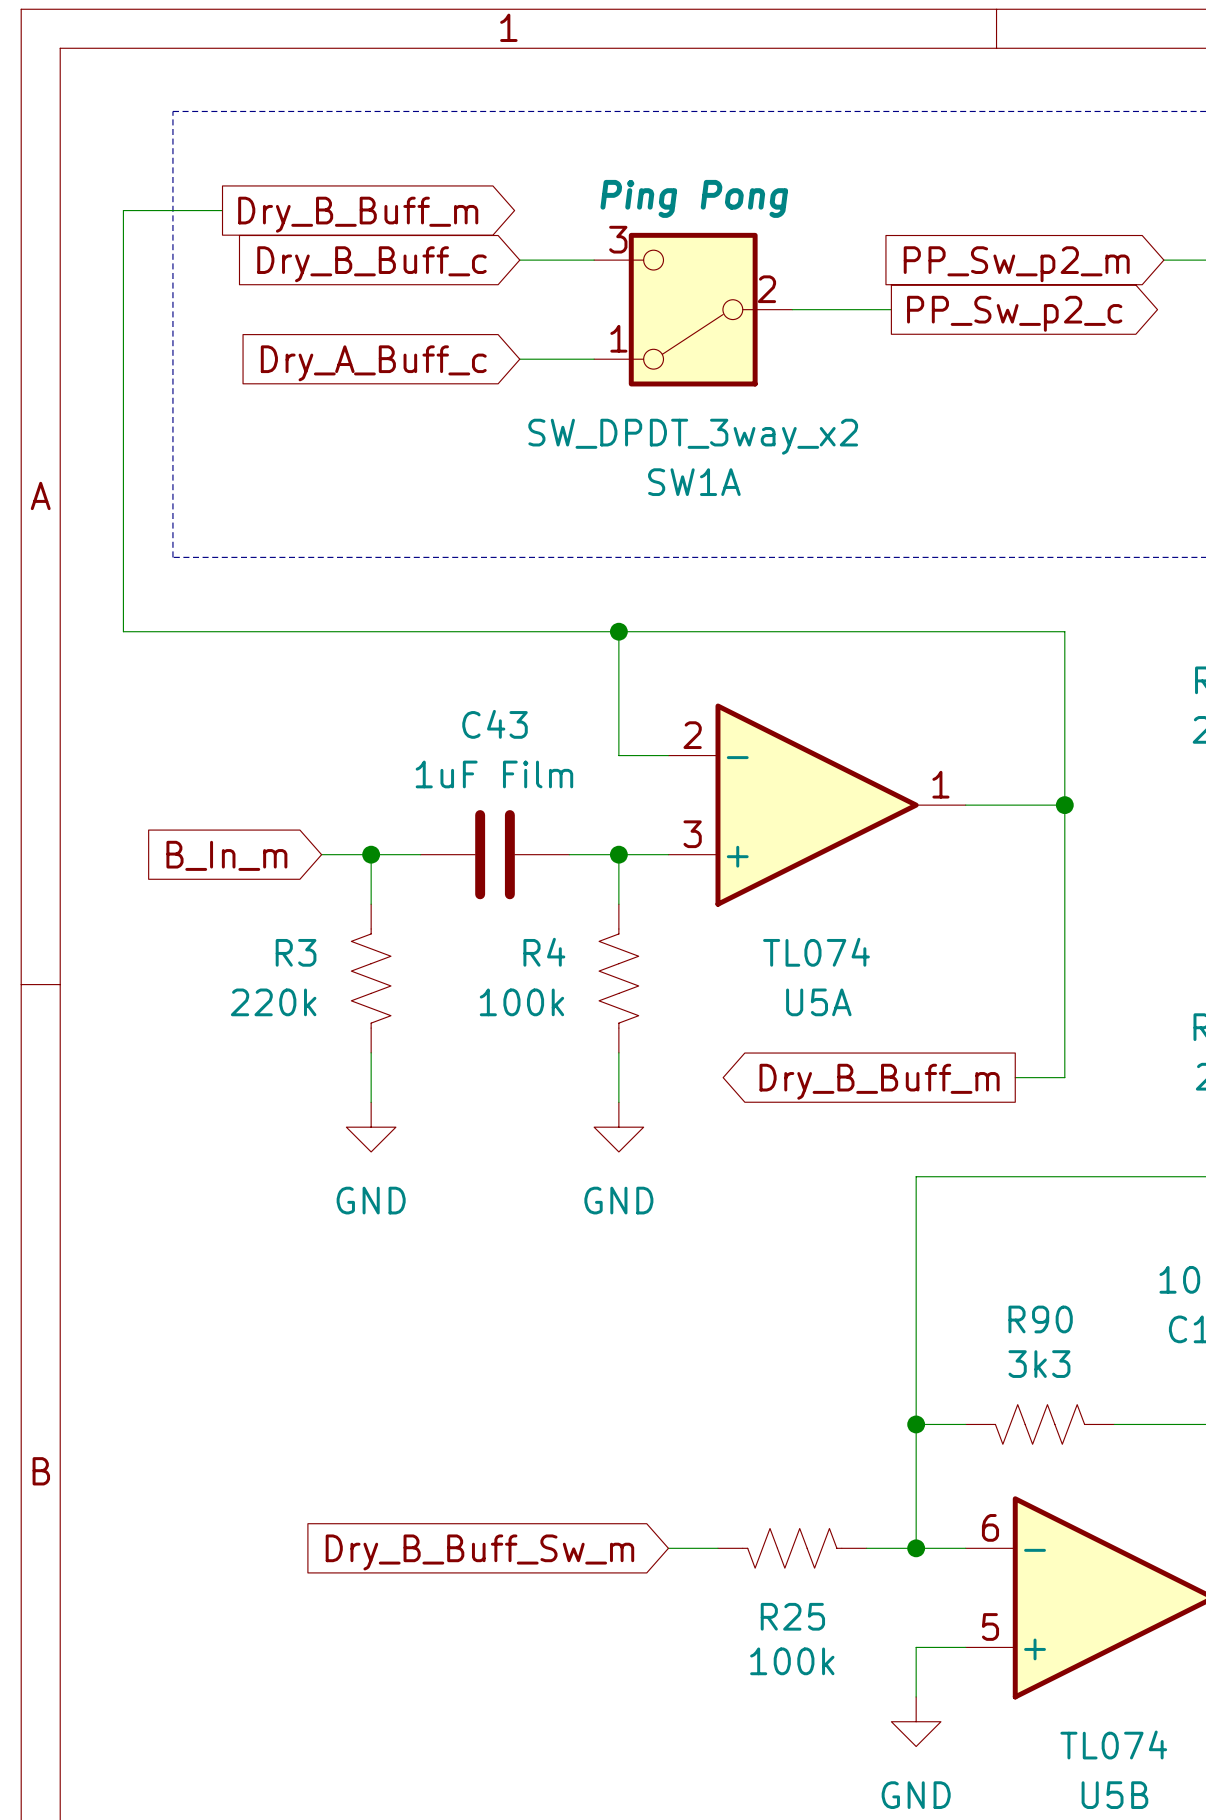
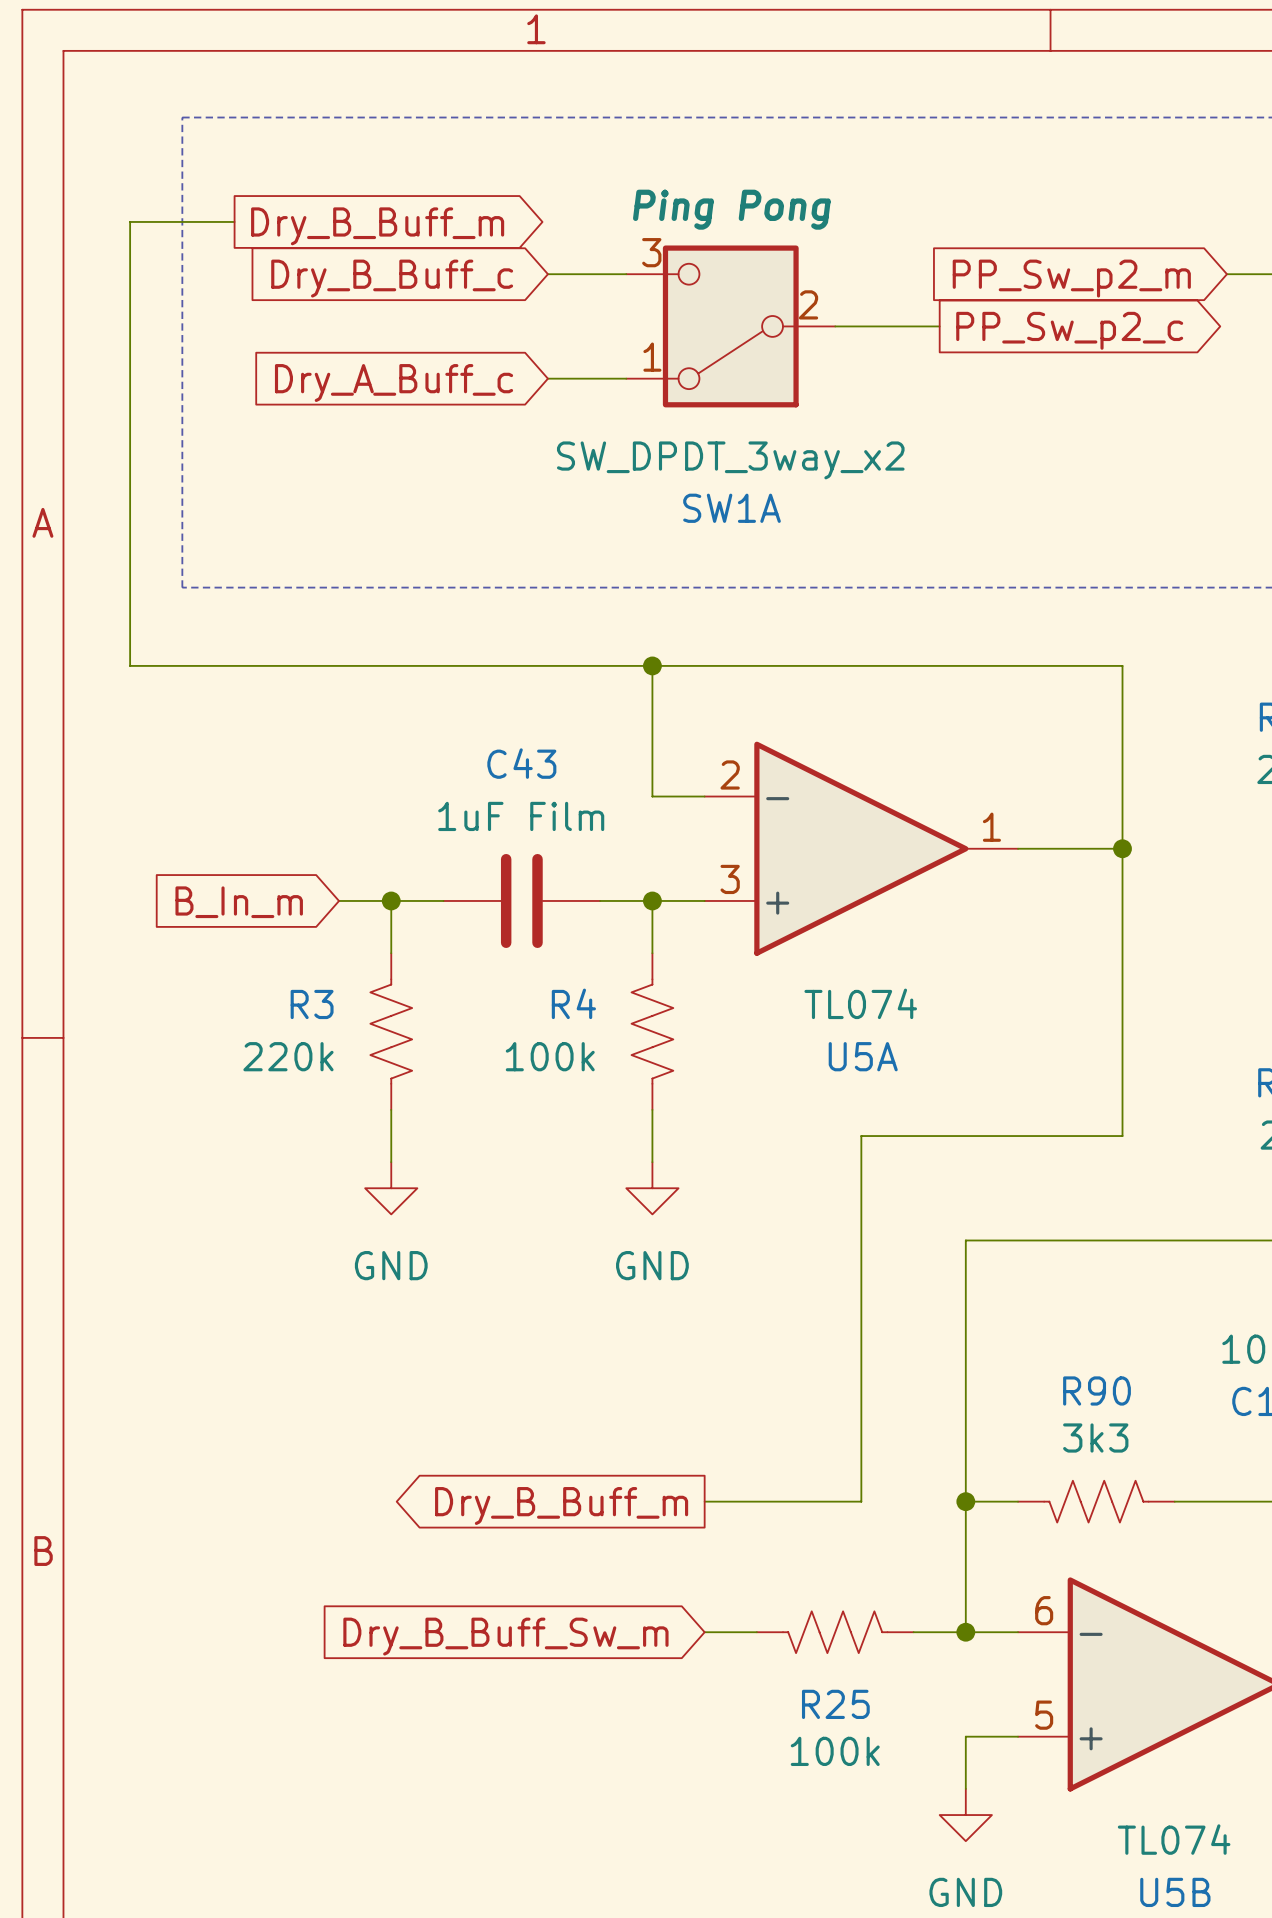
wire: none -> (1070, 1136) (861, 1136) (861, 1501) (704, 1501)
global label: Dry_B_Buff_m (879, 1081) -> none
global label: none -> Dry_B_Buff_m (561, 1506)

